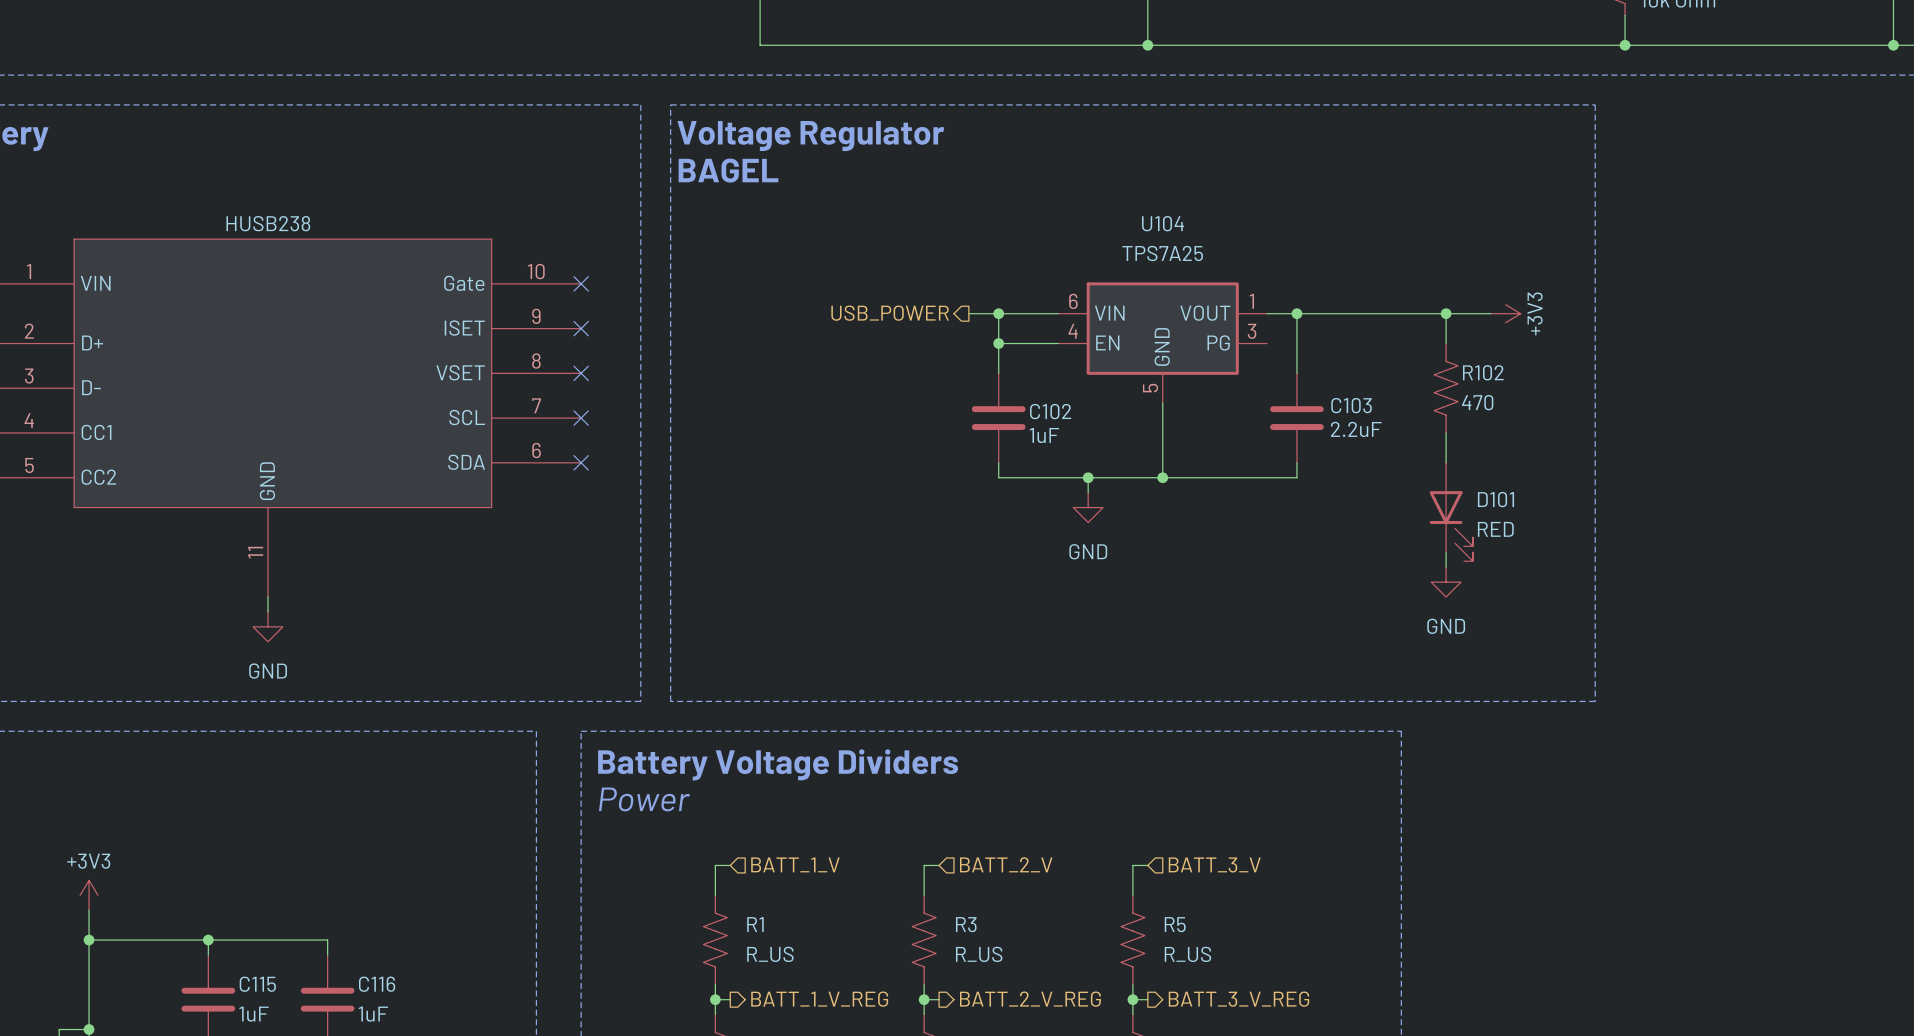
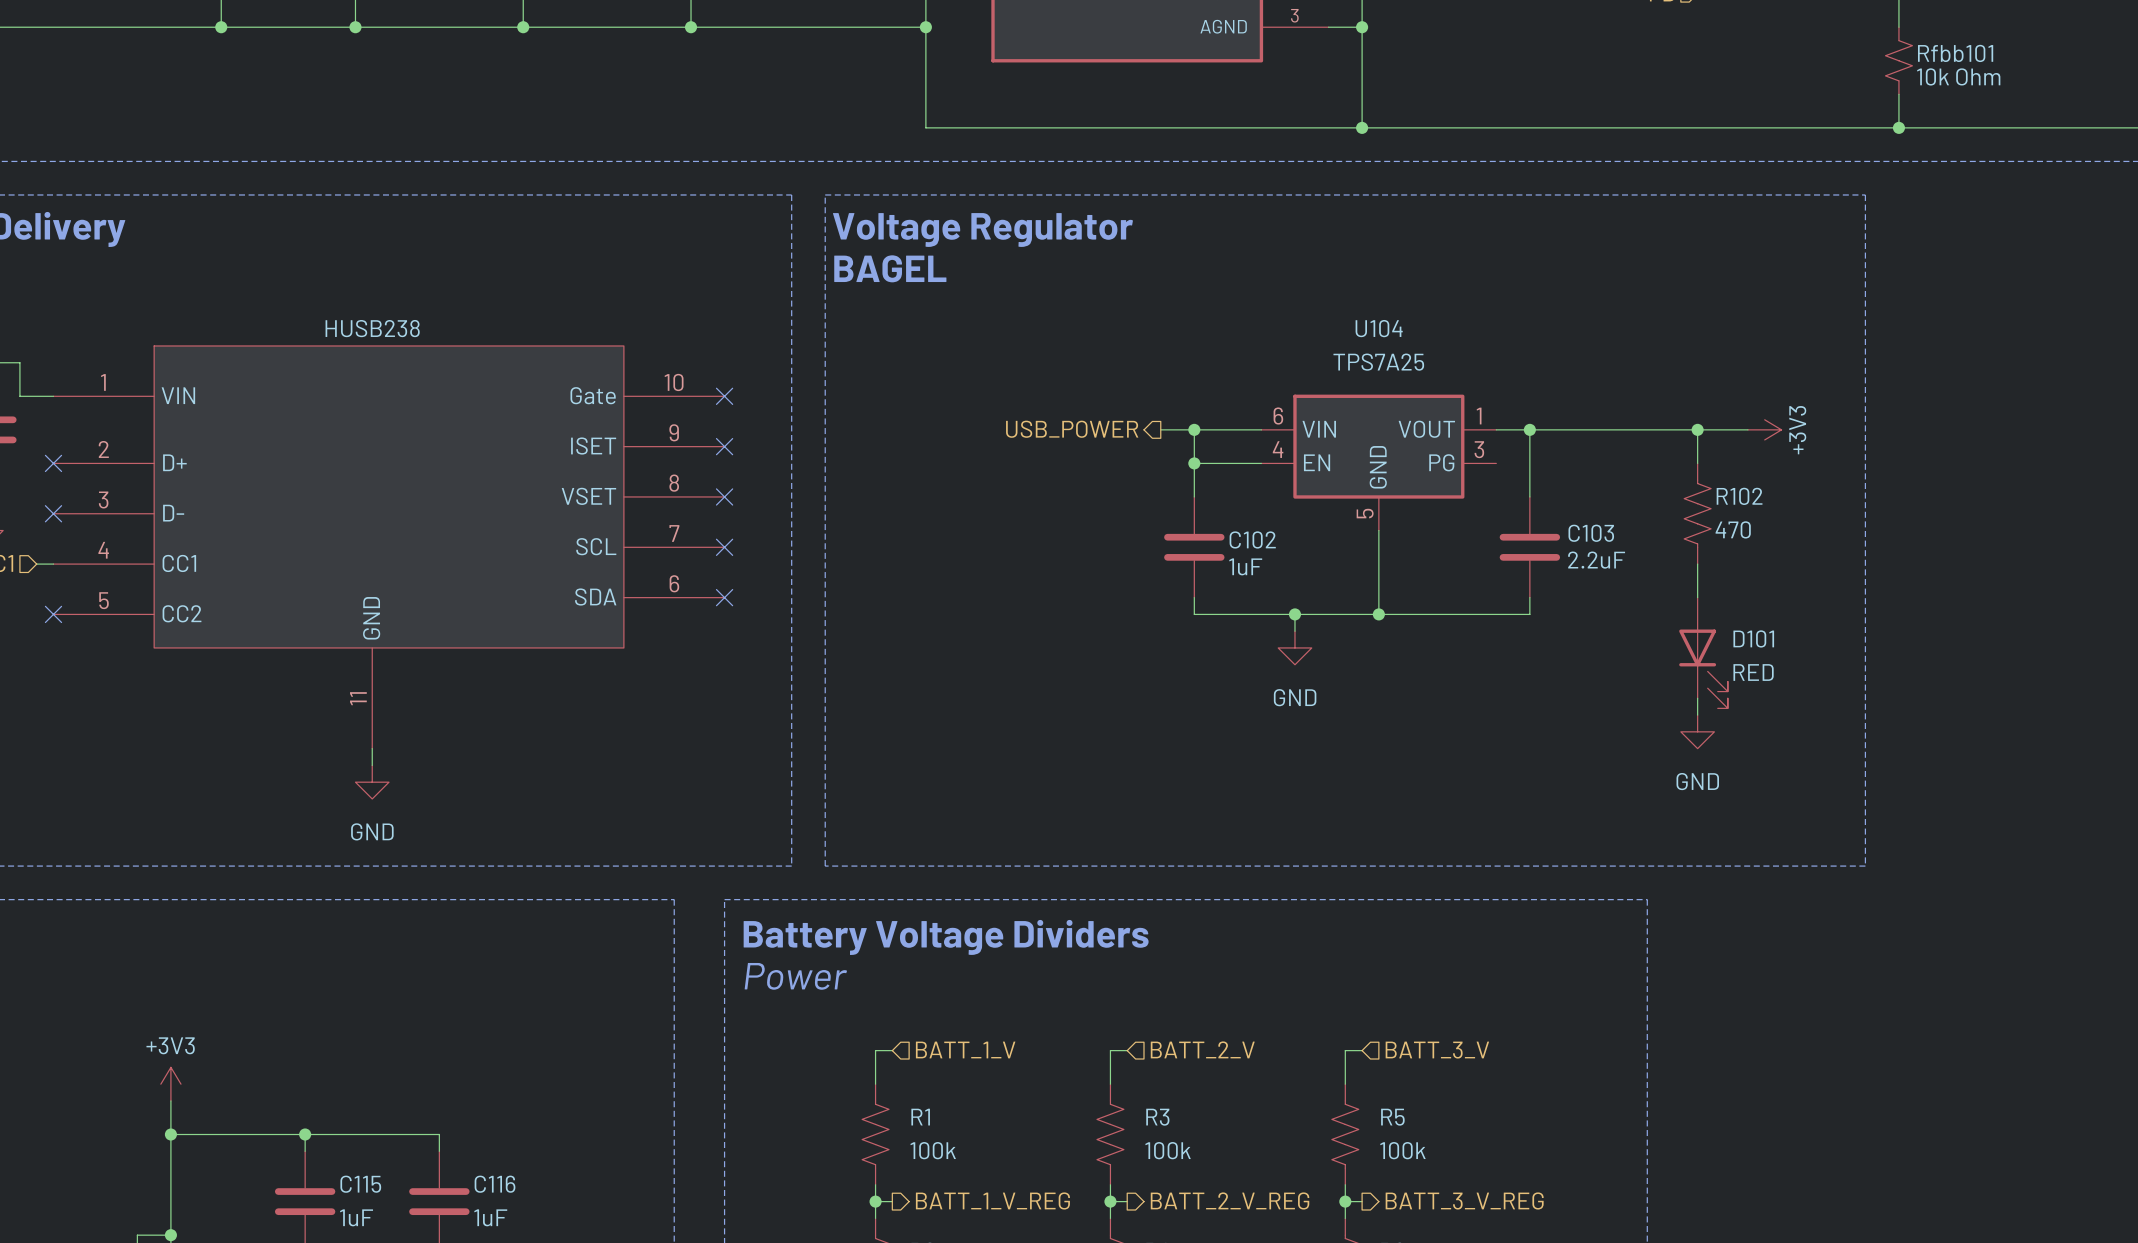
R1 value: R_US (770, 954) -> 100k (933, 1150)
R3 value: R_US (979, 954) -> 100k (1168, 1150)
R5 value: R_US (1187, 954) -> 100k (1402, 1150)

